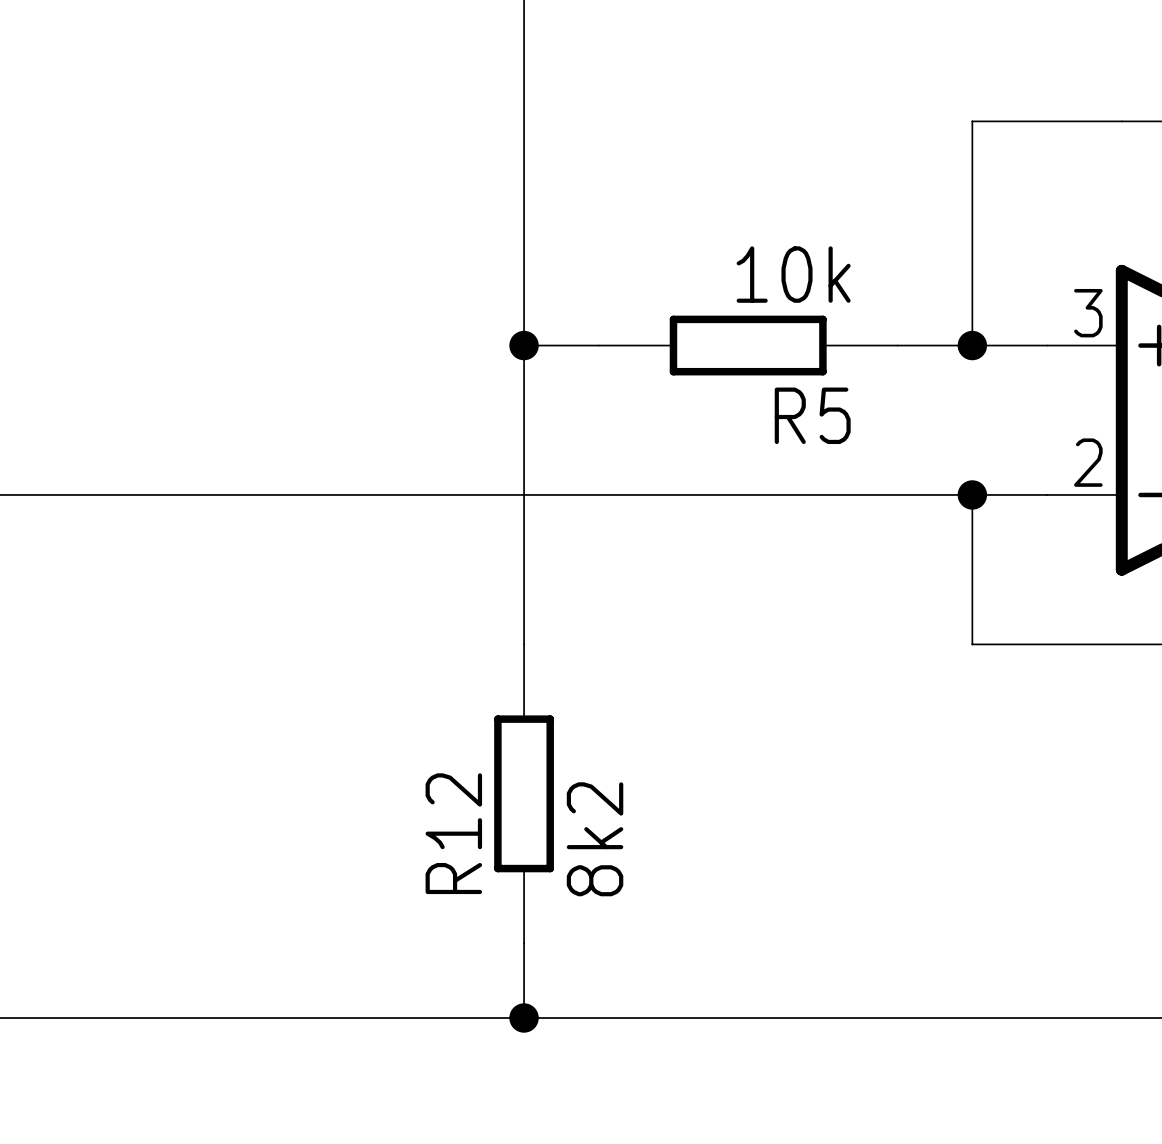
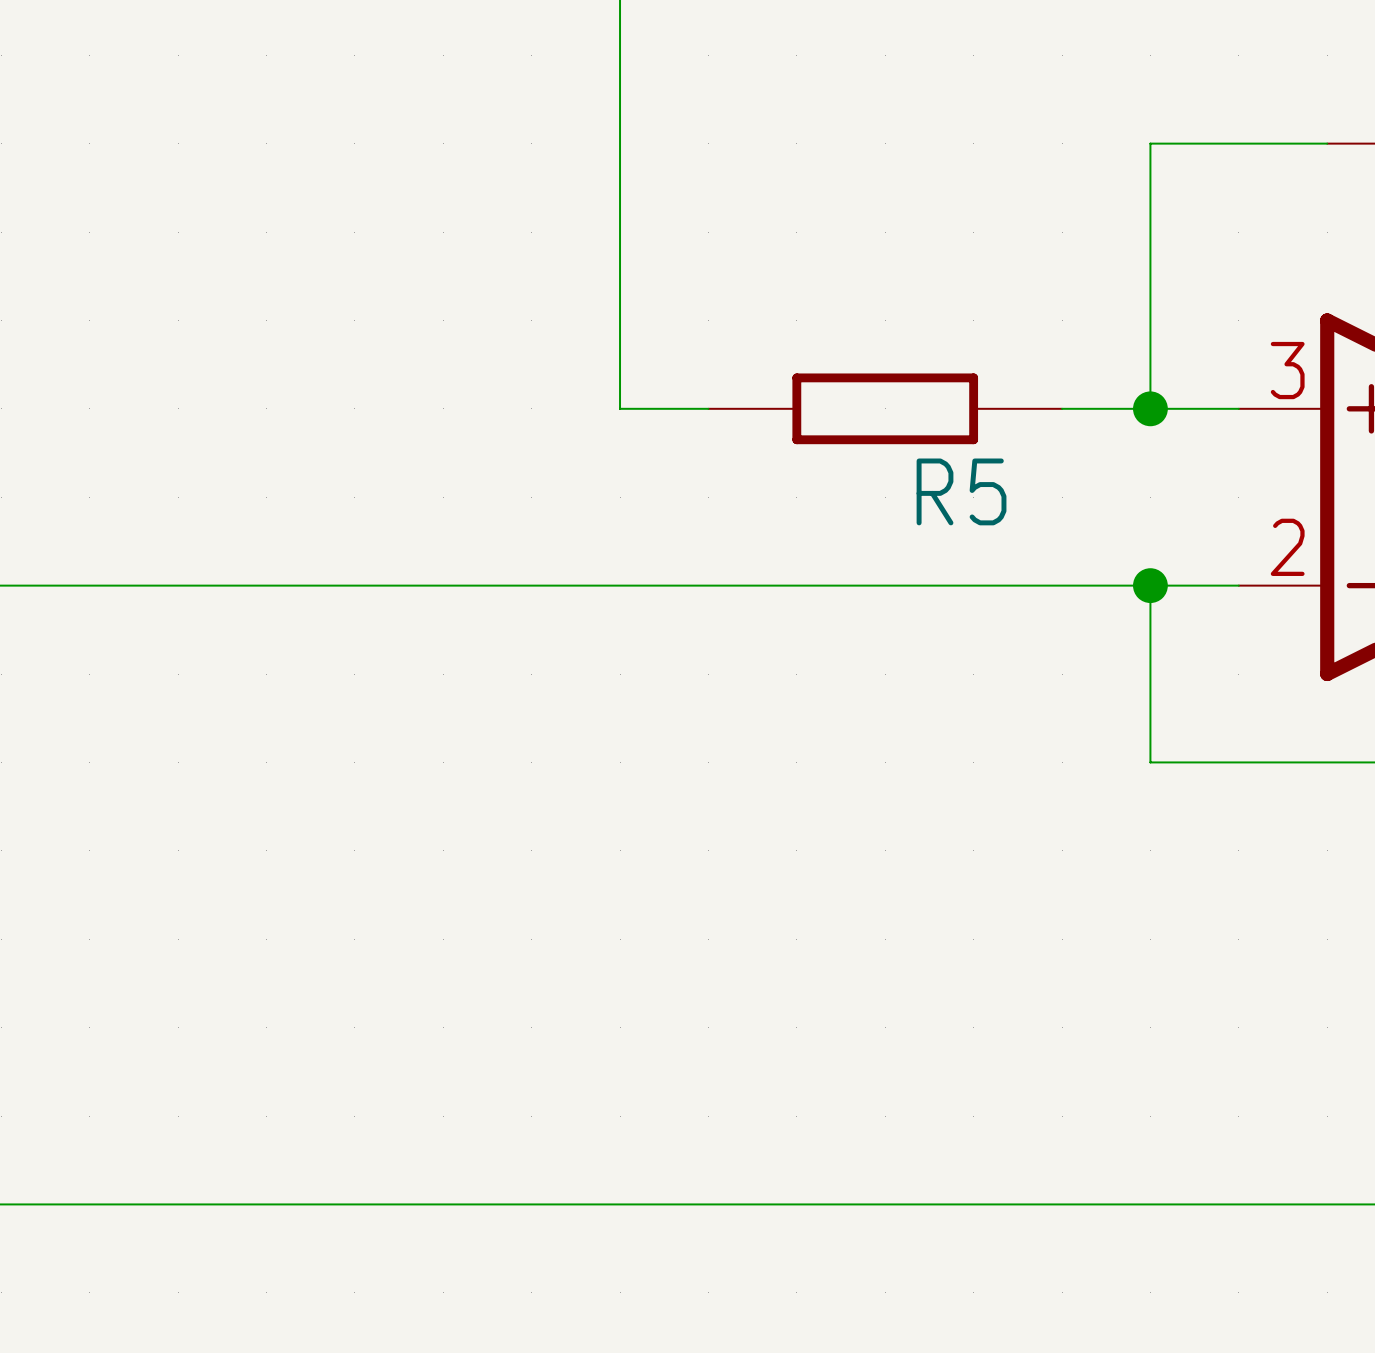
R5 value: 10k (793, 274) -> none
wire: (524, 345) (524, 644) -> none
junction: (524, 345) -> none
R12: 8k2 (524, 793) -> none
wire: (524, 943) (524, 1018) -> none
junction: (524, 1018) -> none

